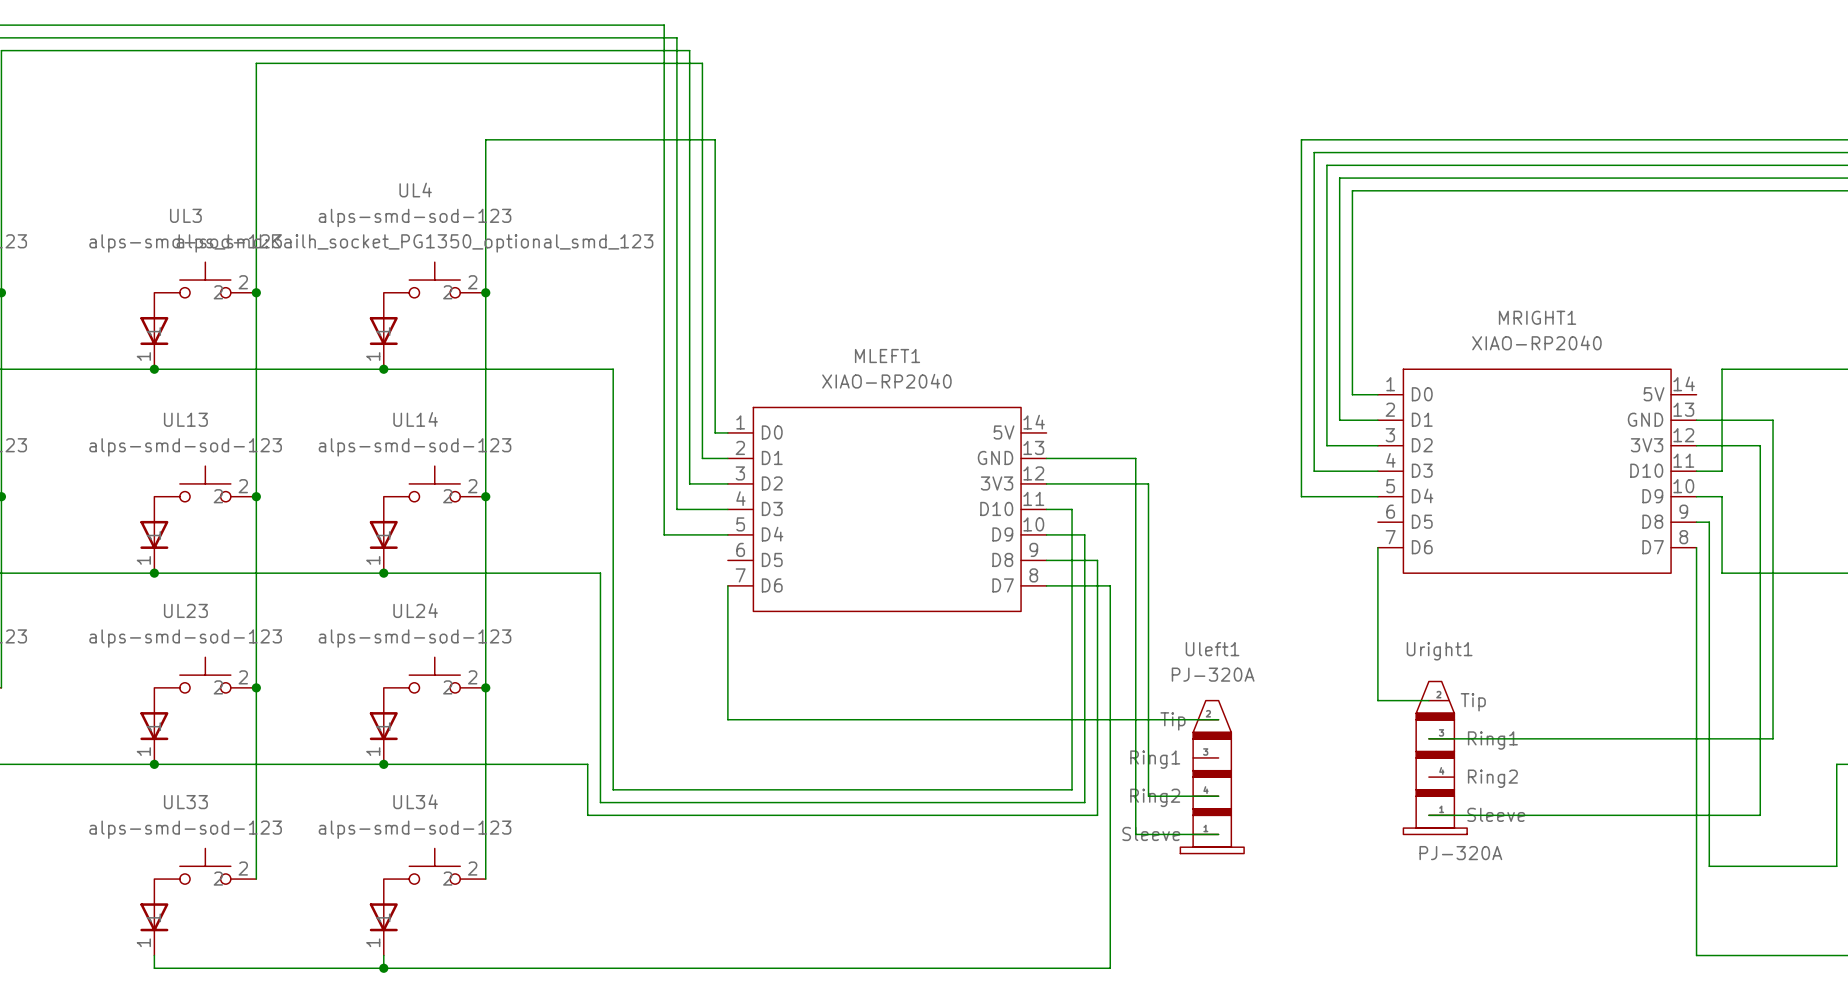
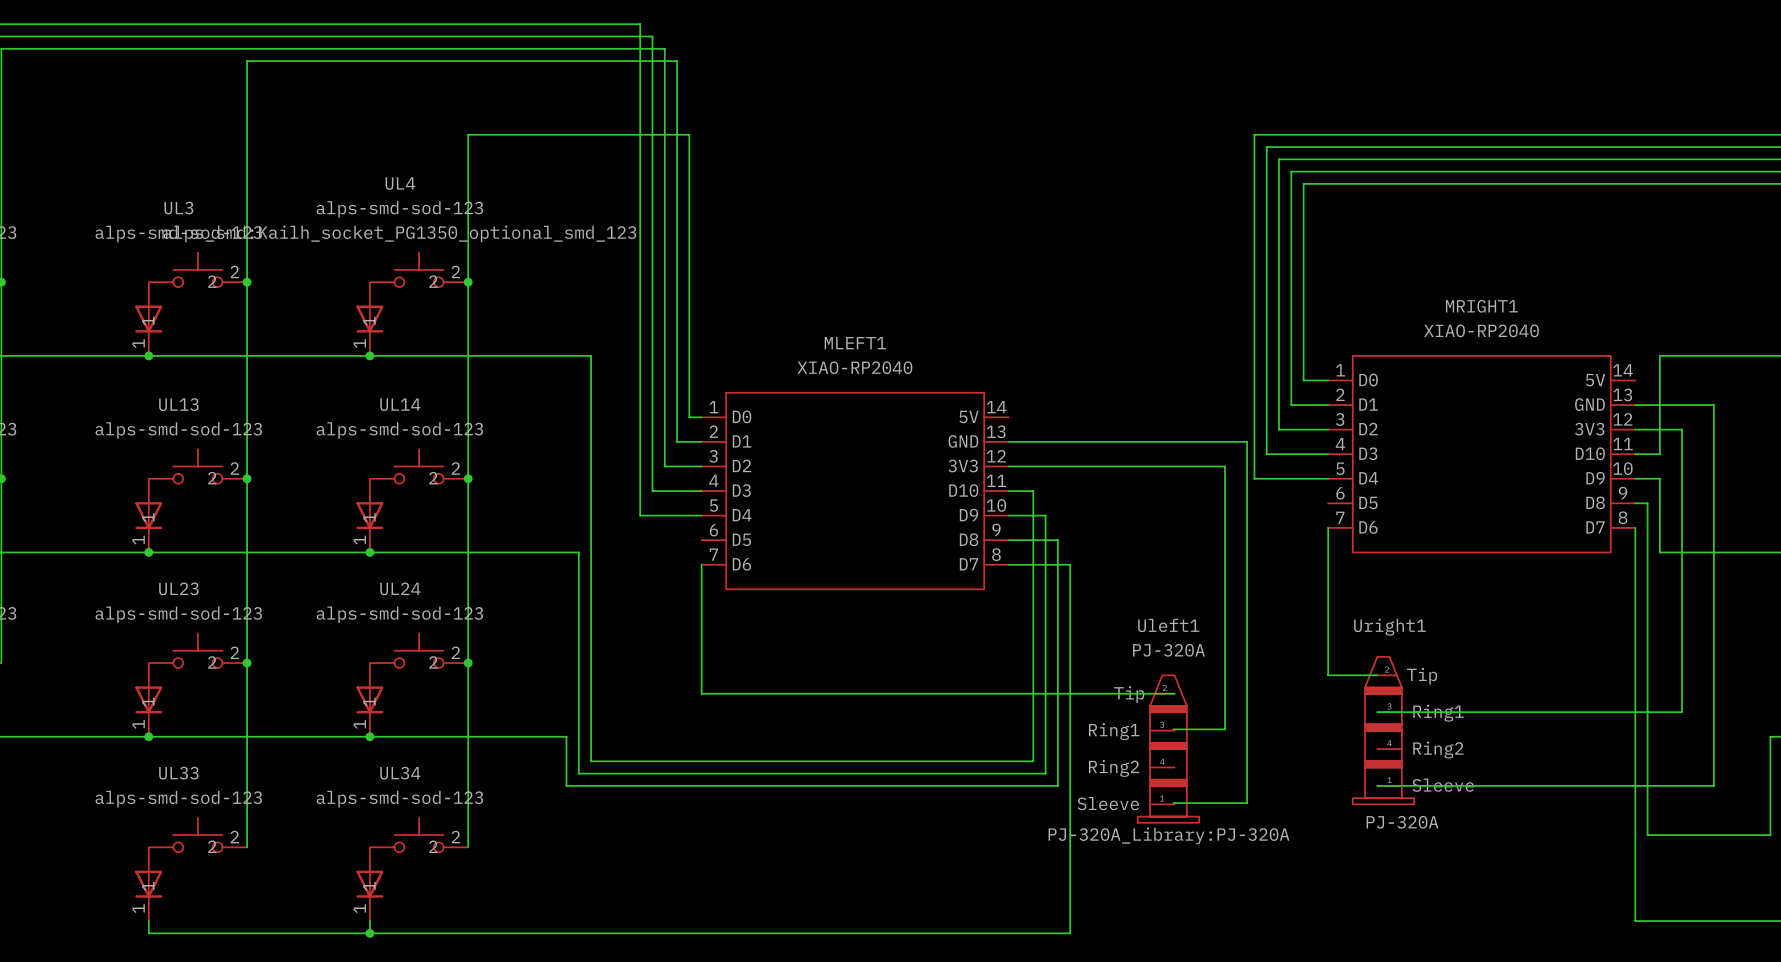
wire: (1773, 420) (1773, 738) (1744, 738) -> (1681, 429) (1681, 712)
wire: (1744, 445) (1760, 445) (1760, 815) -> (1709, 405) (1713, 405) (1713, 785) (1696, 785)
wire: (1135, 458) (1135, 834) (1218, 834) -> (1094, 441) (1247, 441) (1247, 803) (1173, 803)
wire: (1148, 483) (1148, 796) (1218, 796) -> (1107, 466) (1224, 466) (1224, 729) (1173, 729)
Uleft1 text: none -> PJ-320A_Library:PJ-320A (1168, 835)

